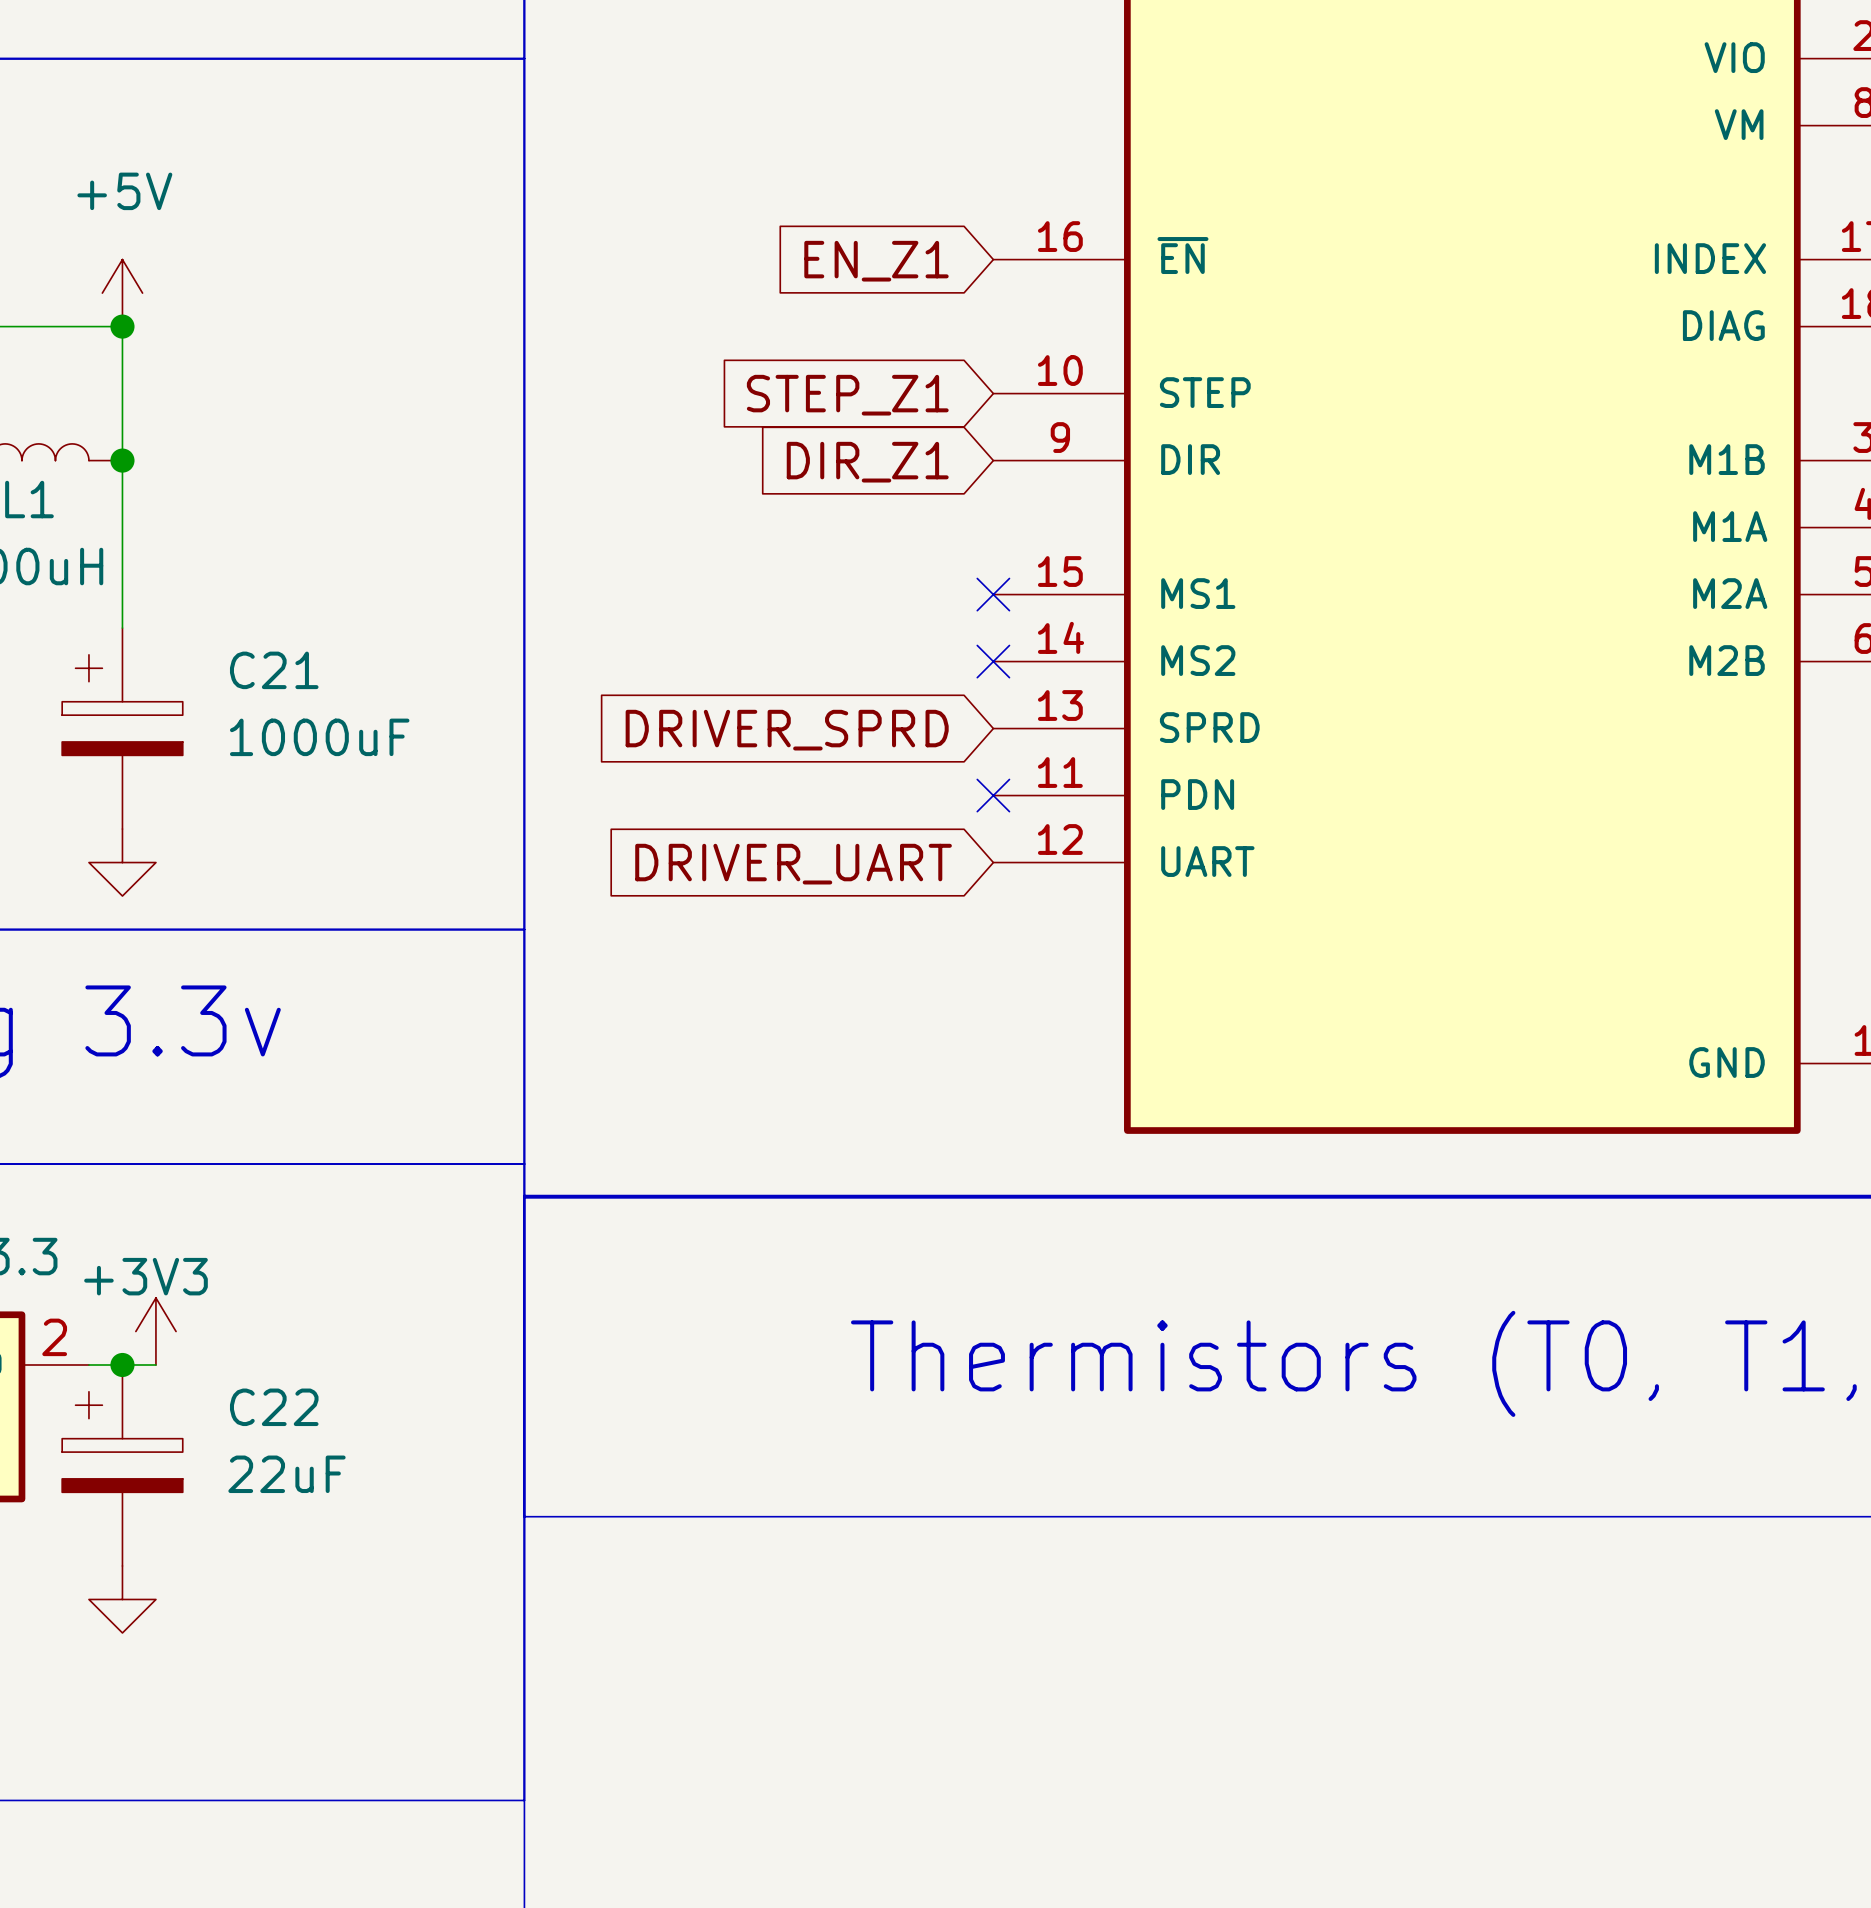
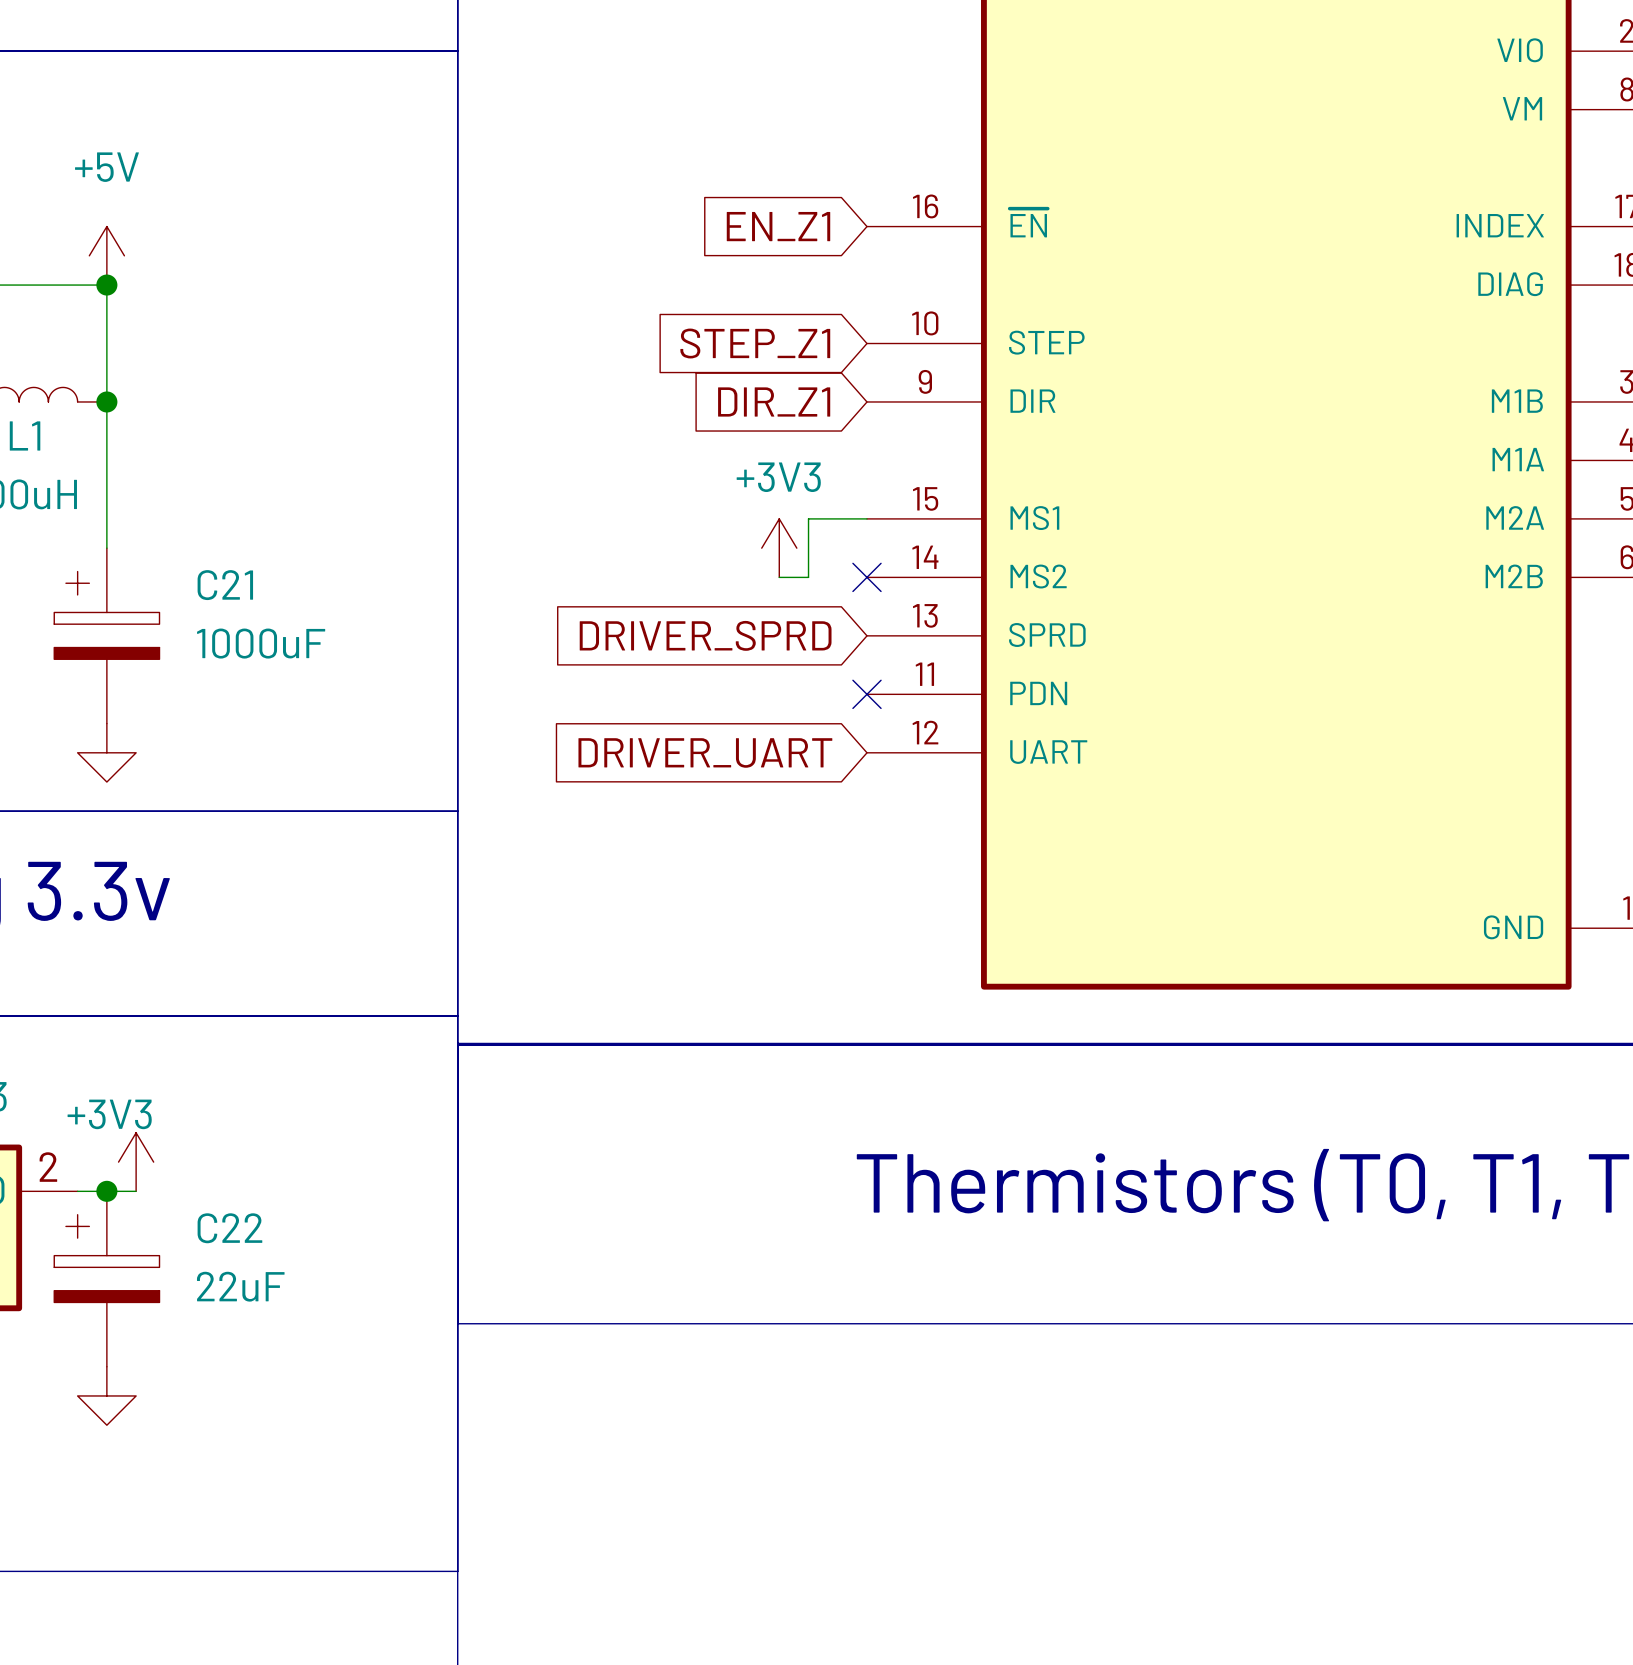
wire: none -> (866, 518) (808, 518) (808, 577) (779, 577)
no-connect mark: (993, 594) -> none
power symbol: none -> +3V3 (779, 548)

